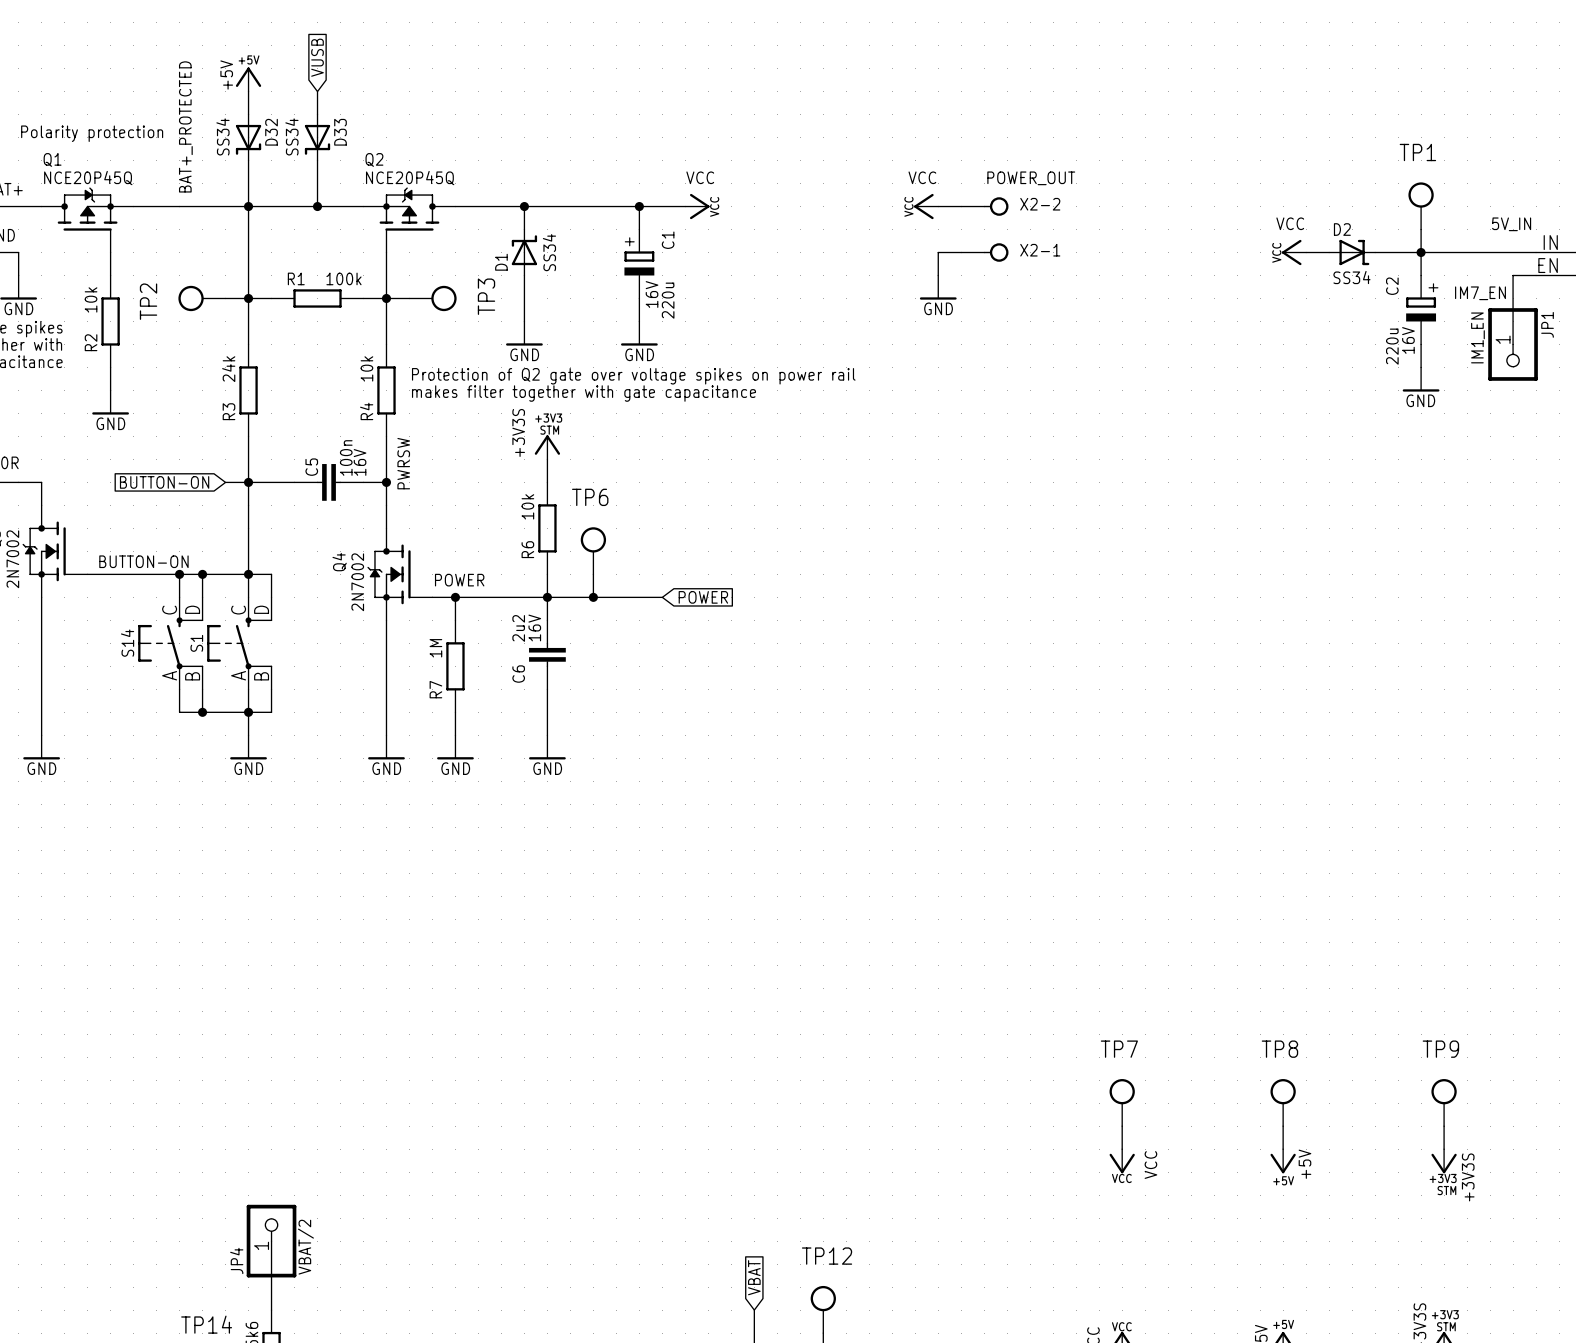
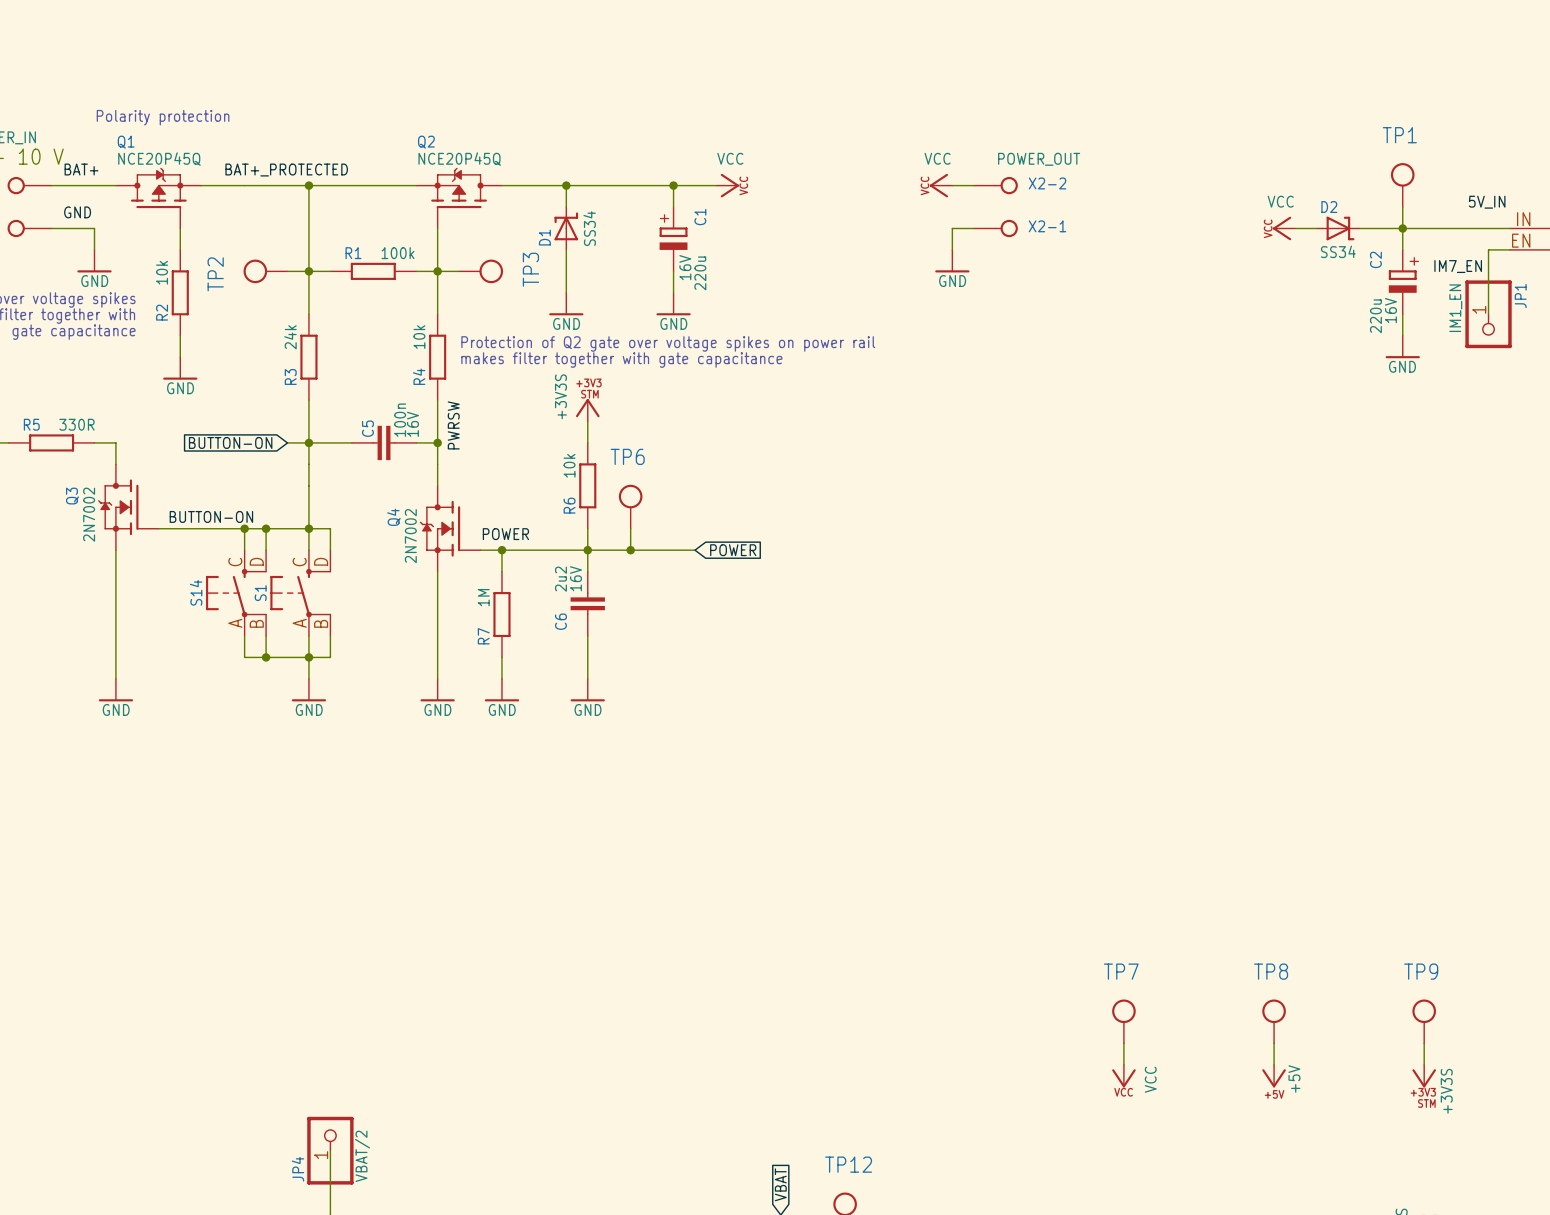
global label: VUSB (317, 57) -> none
power symbol: +5V (248, 79) -> none
wire: (248, 91) (248, 114) -> none
wire: (317, 91) (317, 114) -> none
label rotation: 0° (185, 126) -> 90° clockwise (286, 170)
D32: SS34 (248, 137) -> none
D33: SS34 (317, 137) -> none
wire: (248, 160) (248, 206) -> none
wire: (317, 160) (317, 206) -> none
junction: (317, 206) -> none

